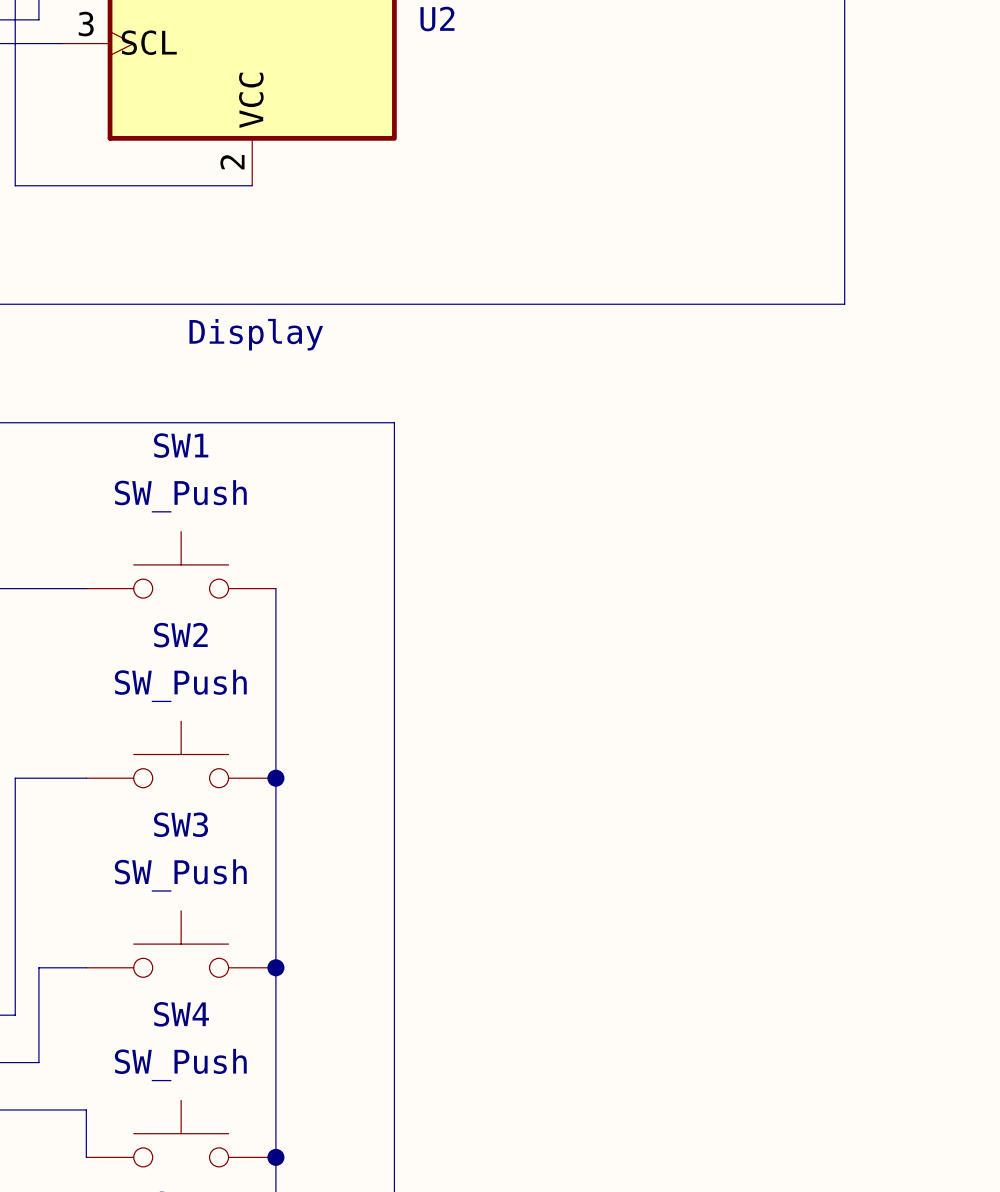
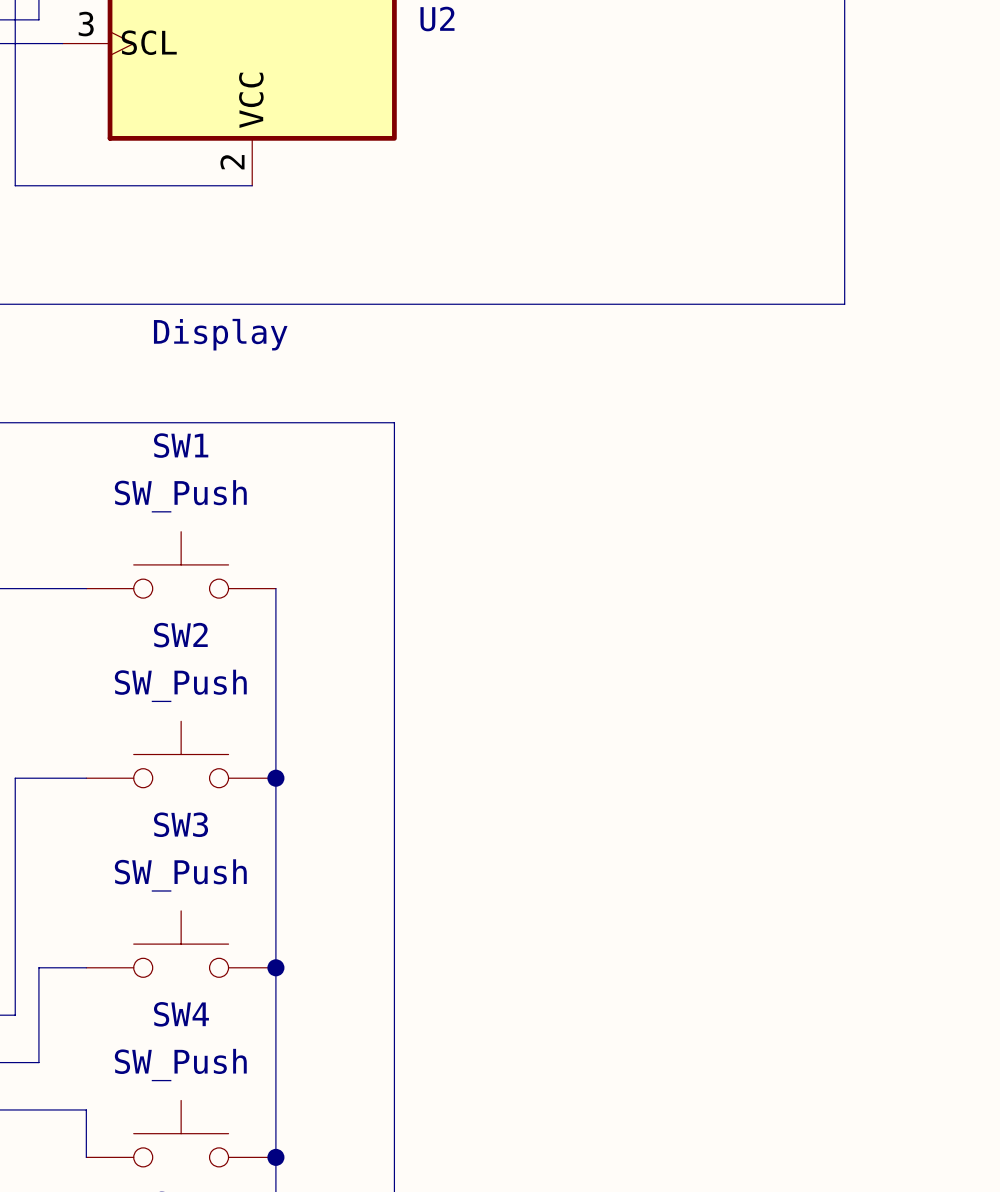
text position: Display (256, 334) -> Display (220, 334)

